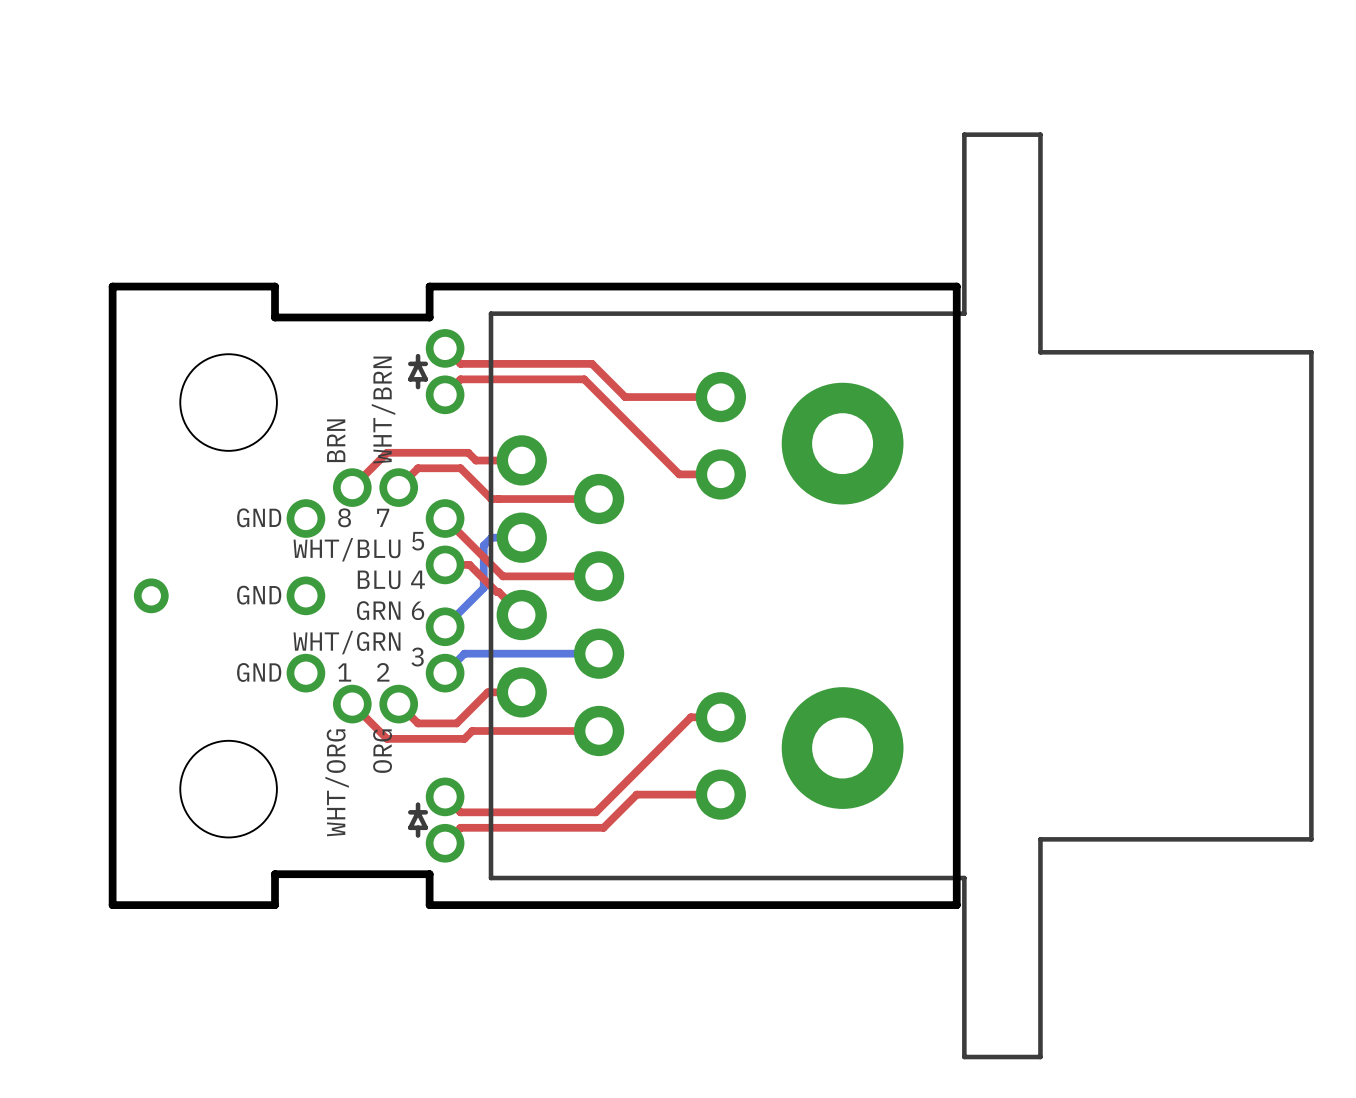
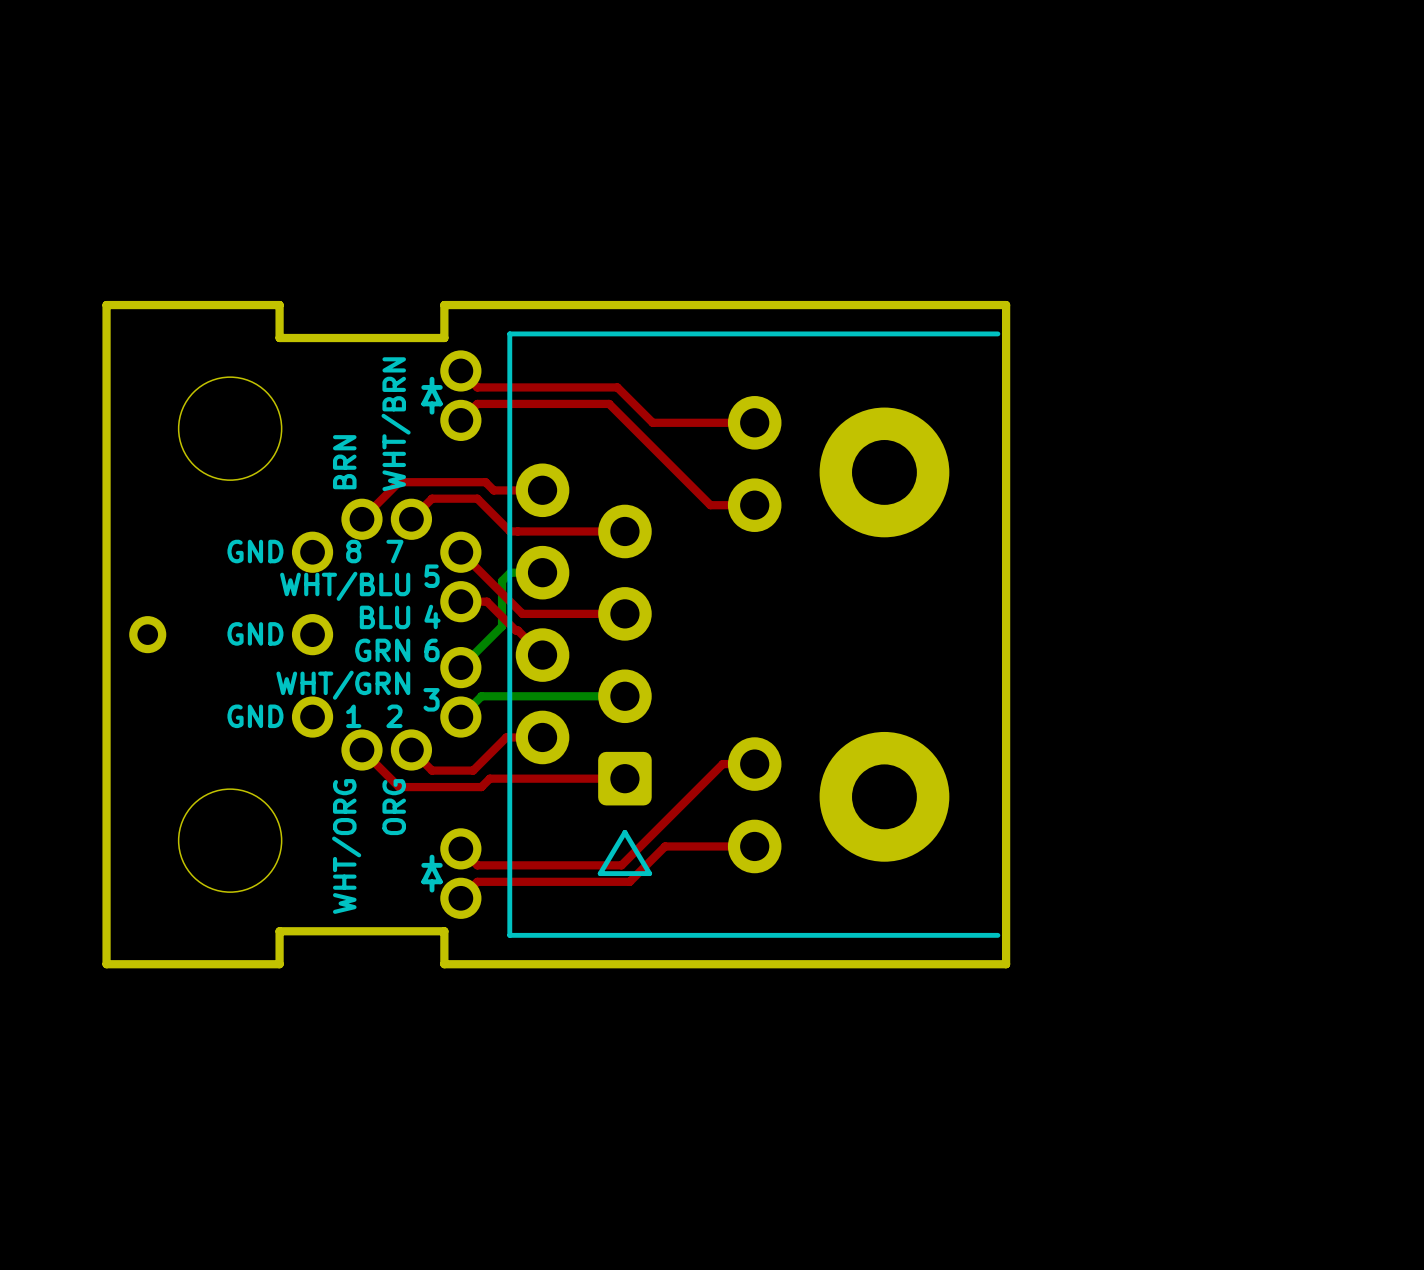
part: none -> (753, 634)
part: (901, 595) -> none

